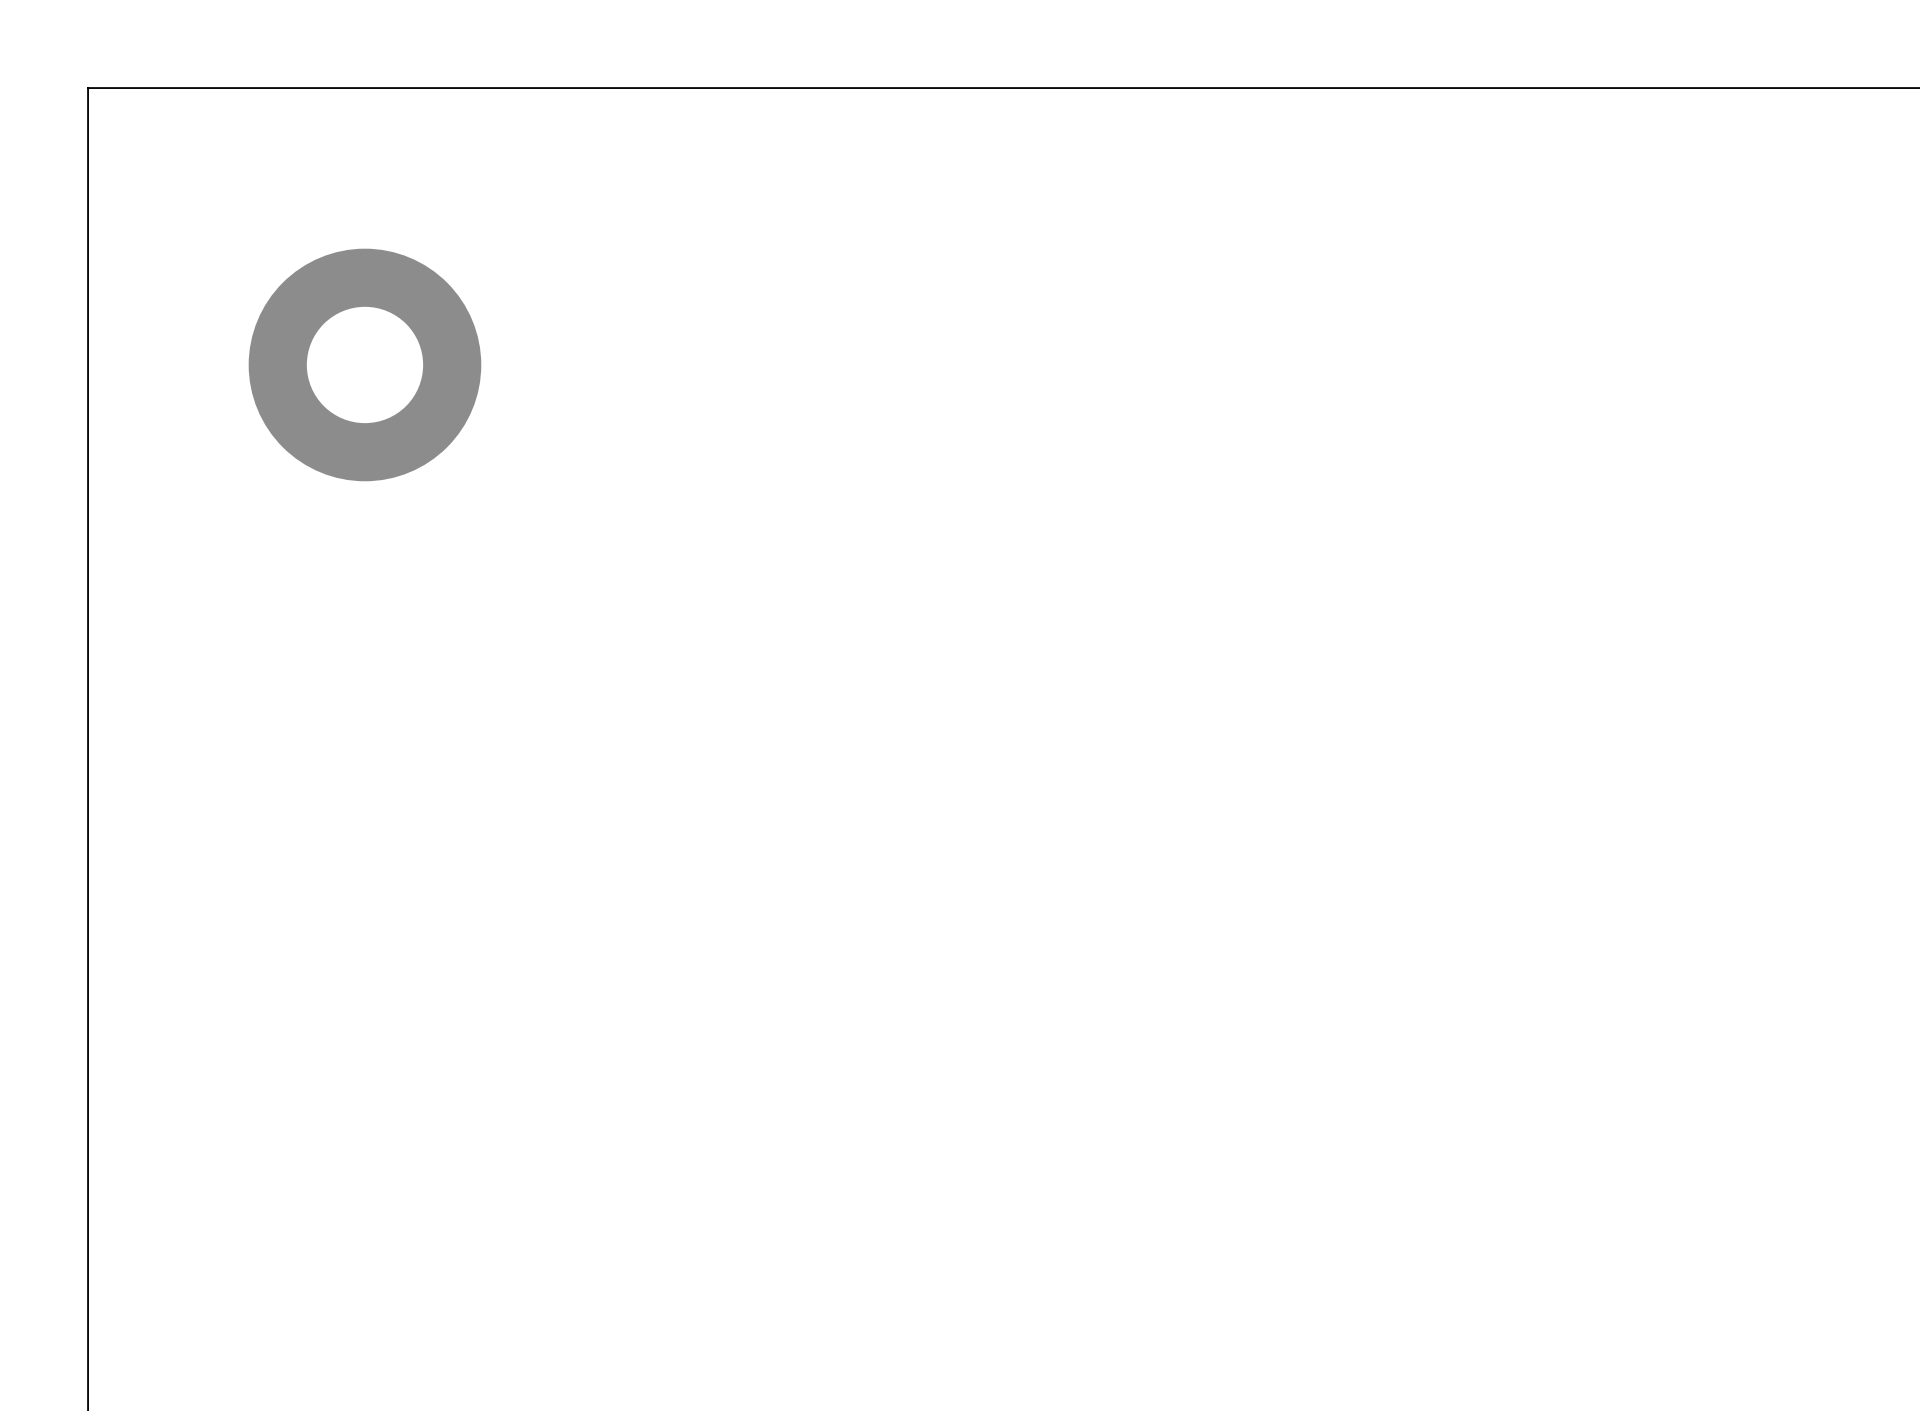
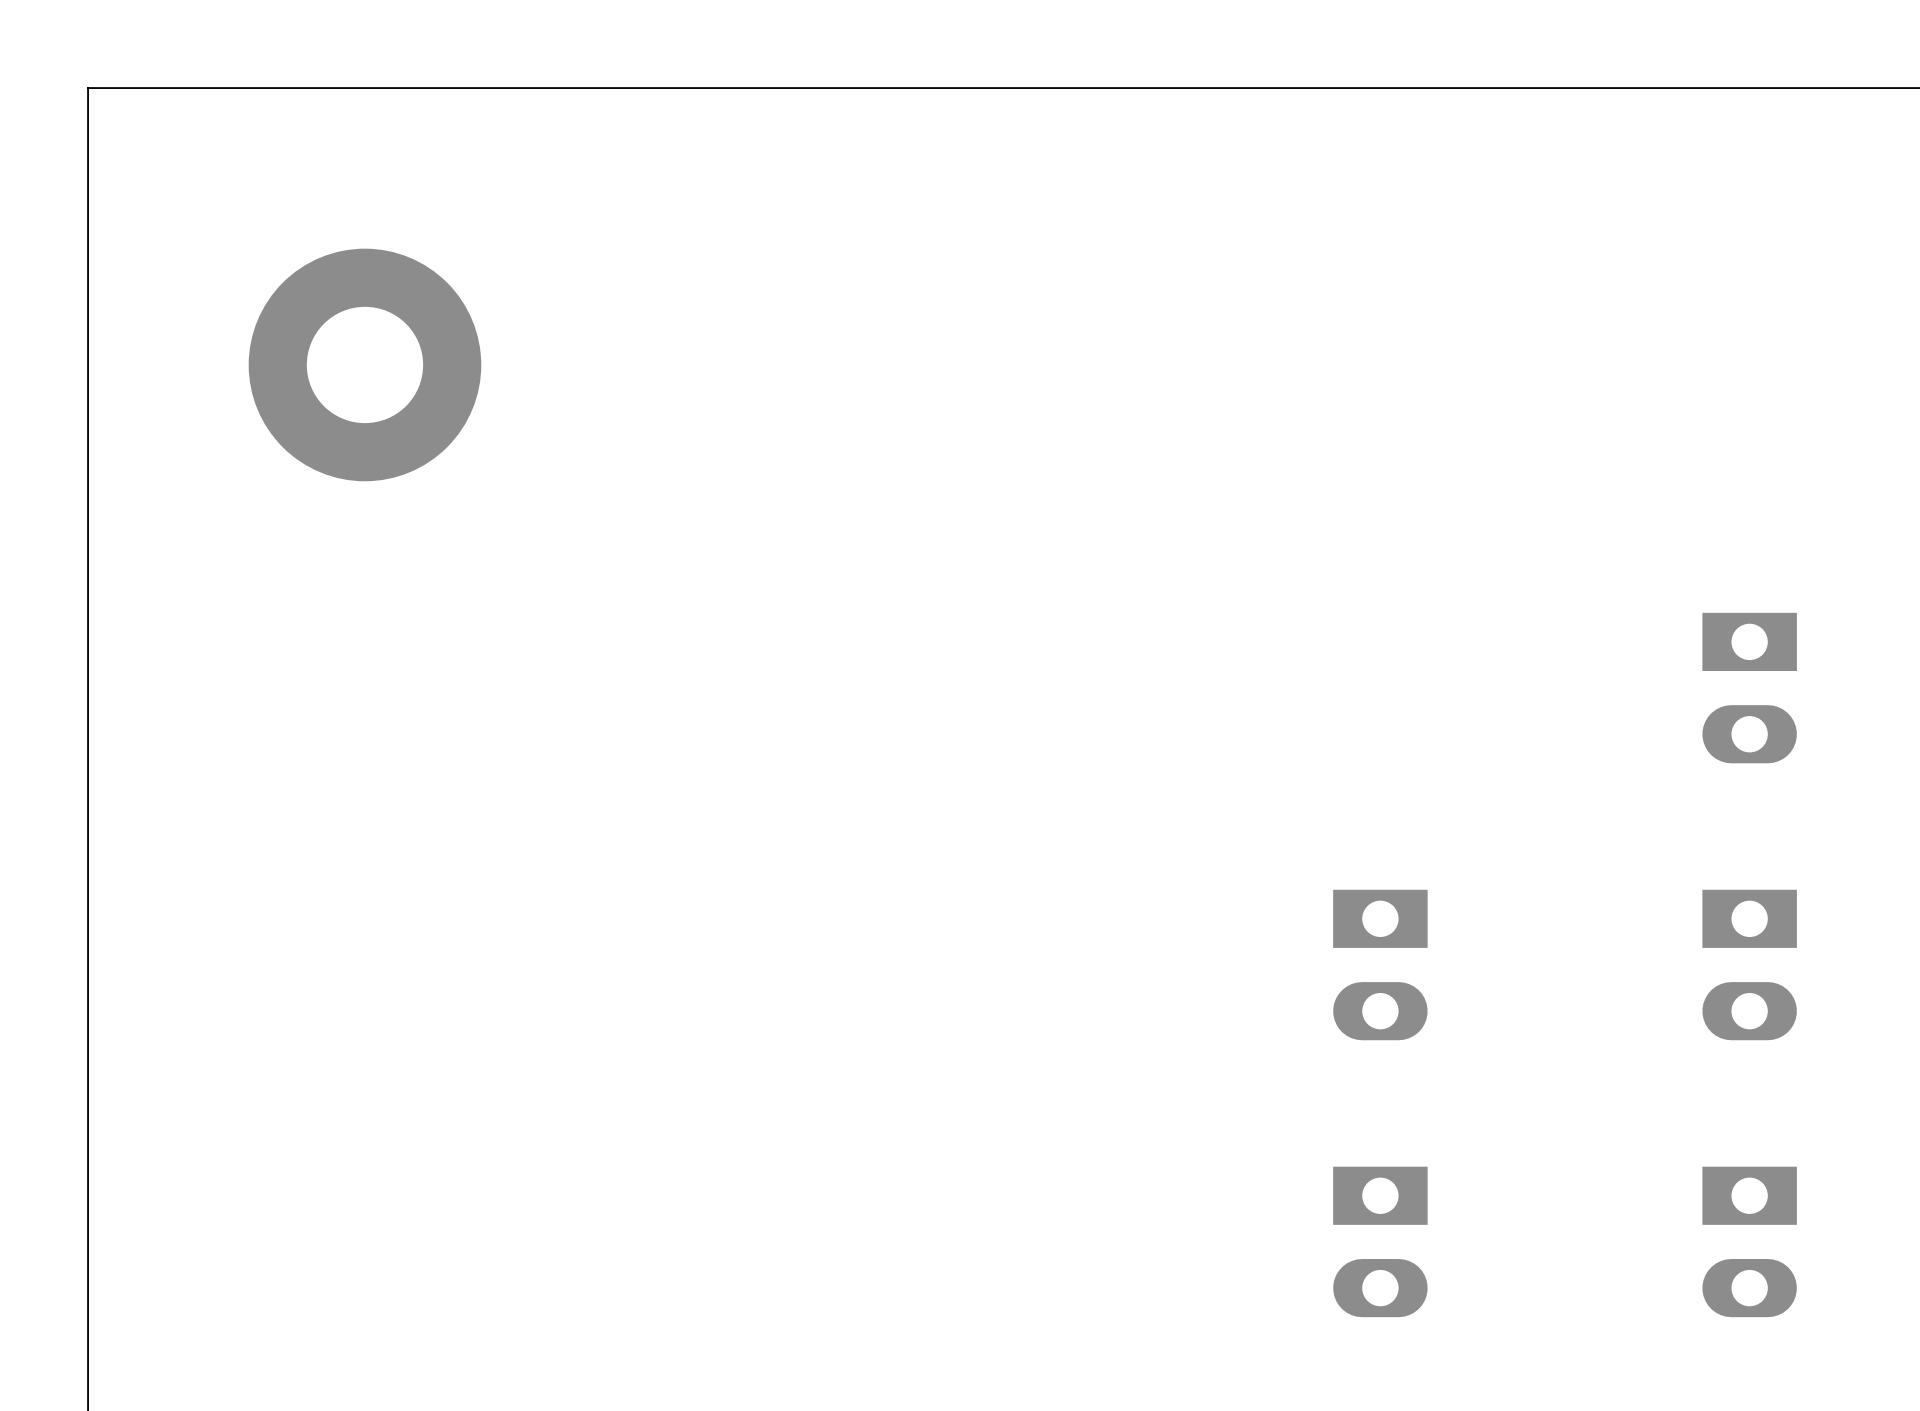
part: none -> (1749, 688)
part: none -> (1380, 965)
part: none -> (1749, 965)
part: none -> (1380, 1241)
part: none -> (1749, 1241)

